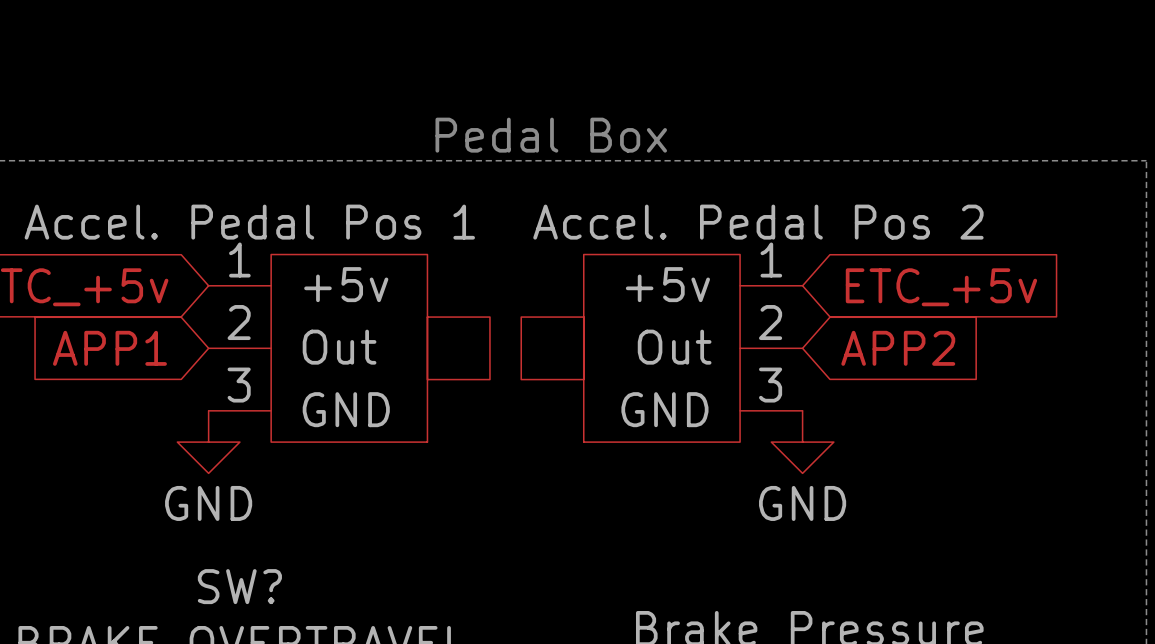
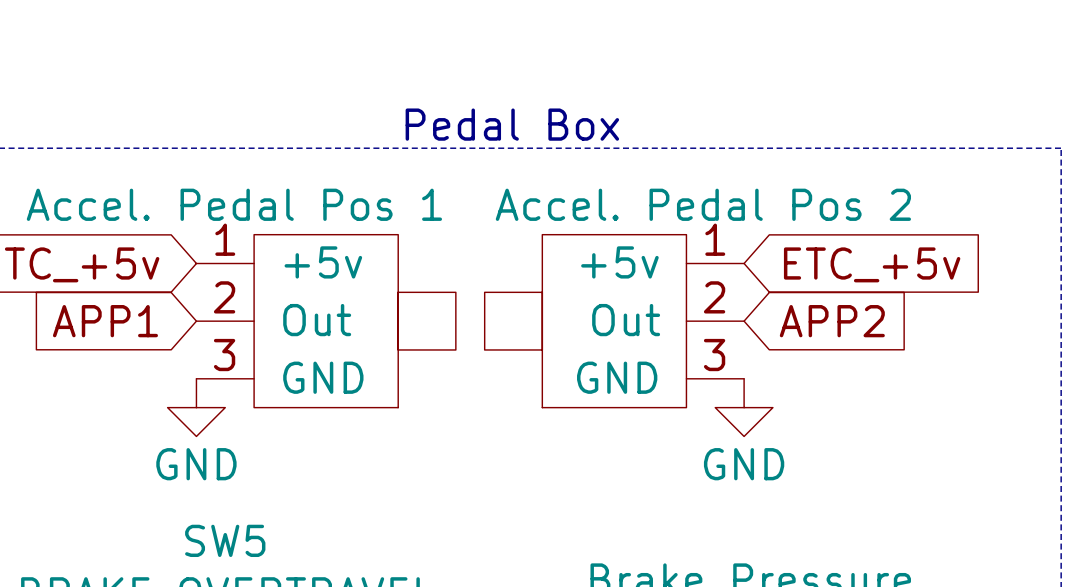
SW? name: SW? (239, 586) -> SW5 (225, 540)

